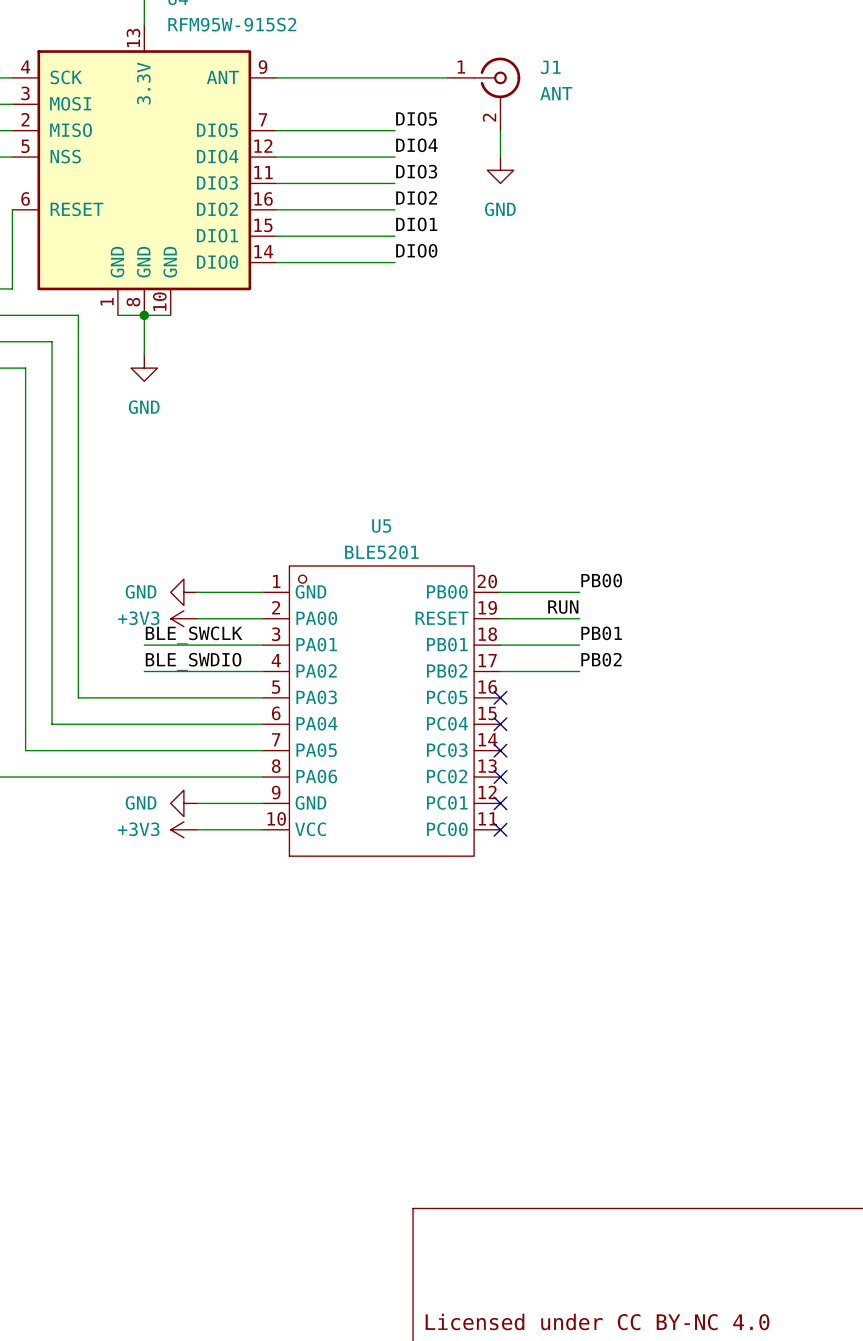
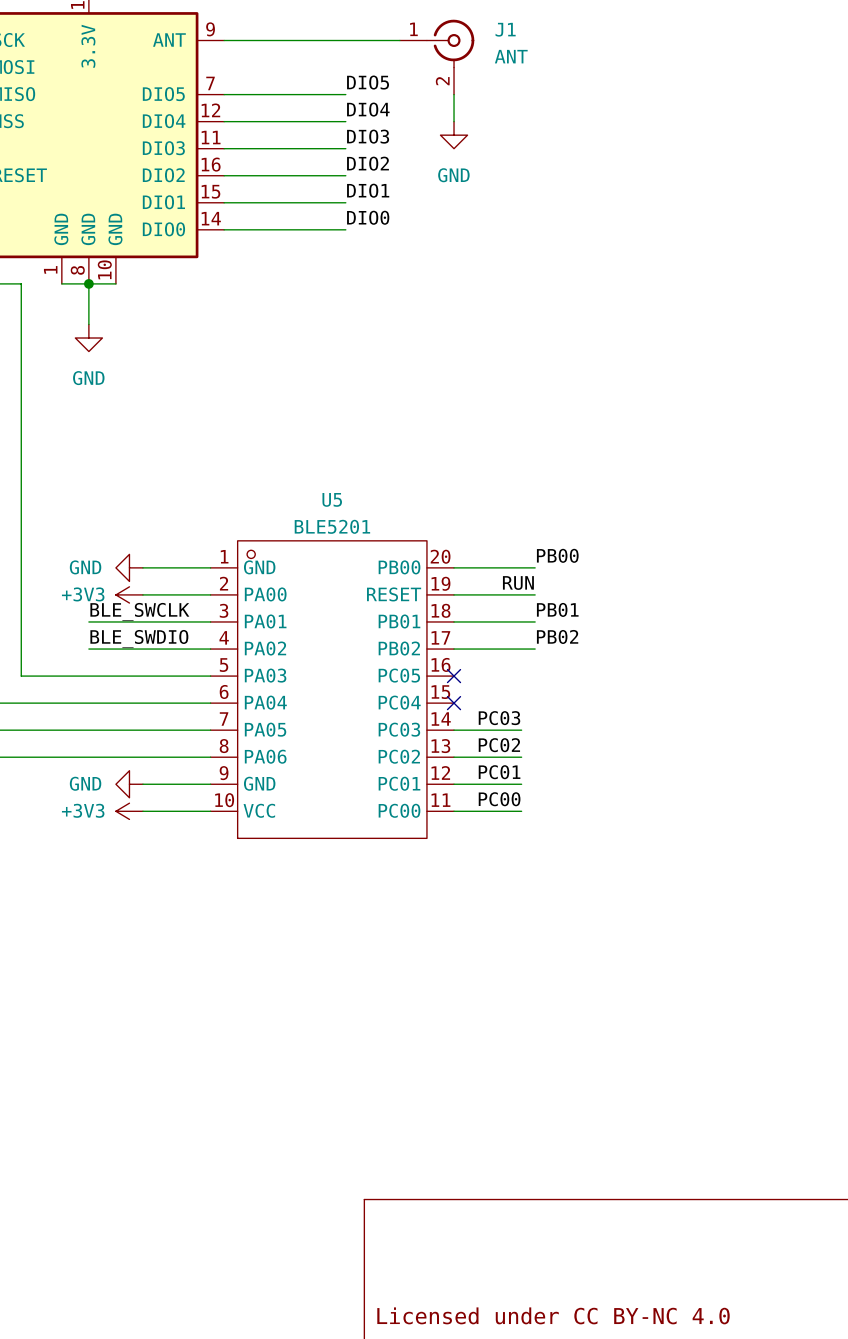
label: none -> PC03 (499, 718)
wire: none -> (454, 730) (521, 730)
no-connect mark: (500, 750) -> none
label: none -> PC02 (499, 745)
wire: none -> (454, 757) (521, 757)
no-connect mark: (500, 777) -> none
label: none -> PC01 (499, 772)
wire: none -> (454, 784) (521, 784)
no-connect mark: (500, 803) -> none
label: none -> PC00 (499, 799)
wire: none -> (454, 811) (521, 811)
no-connect mark: (500, 829) -> none

